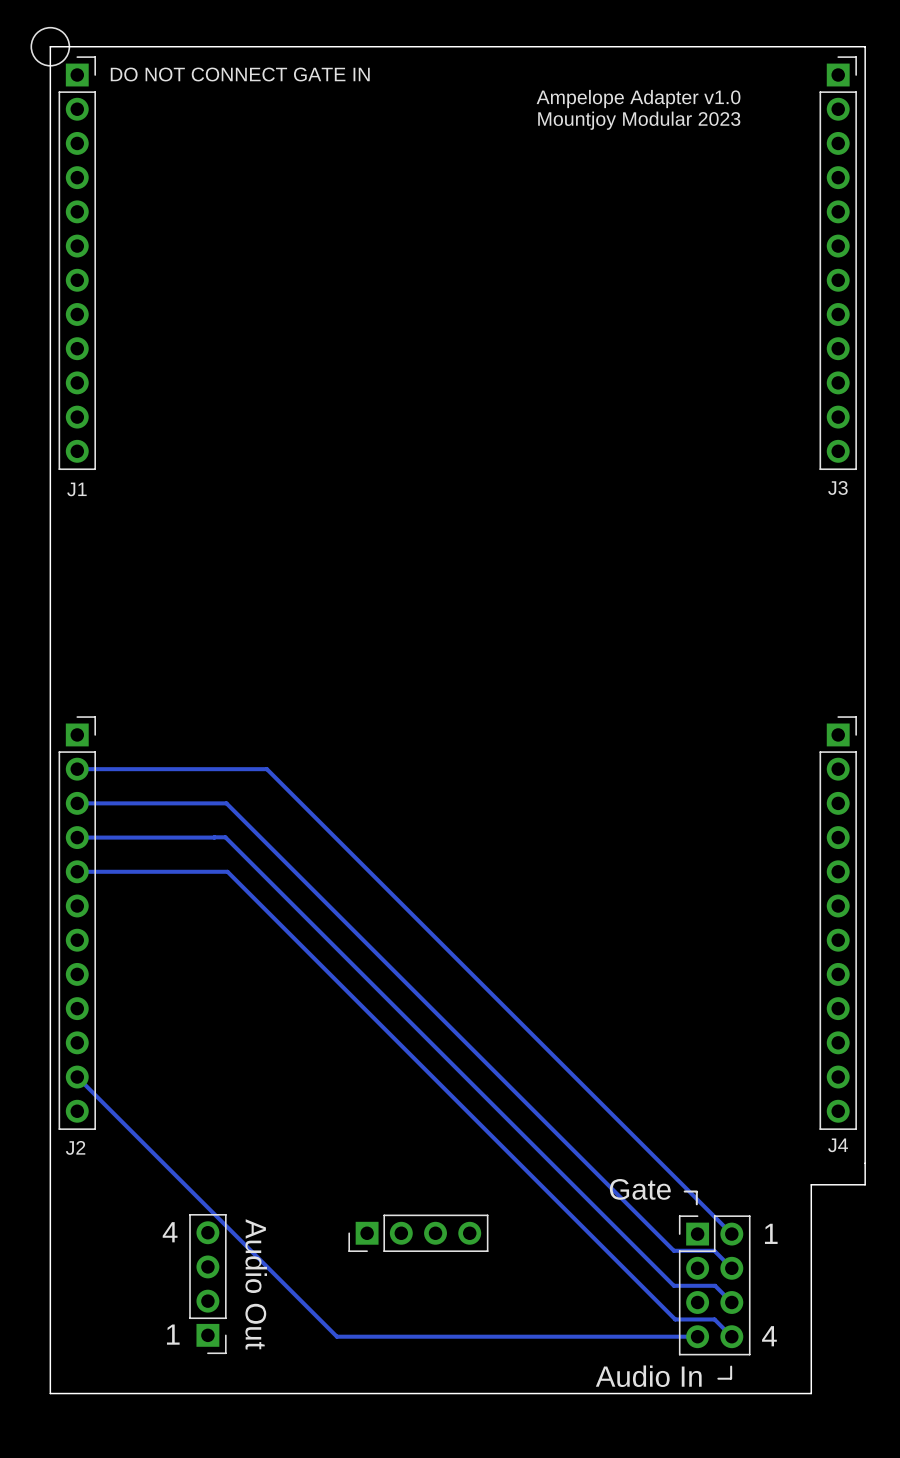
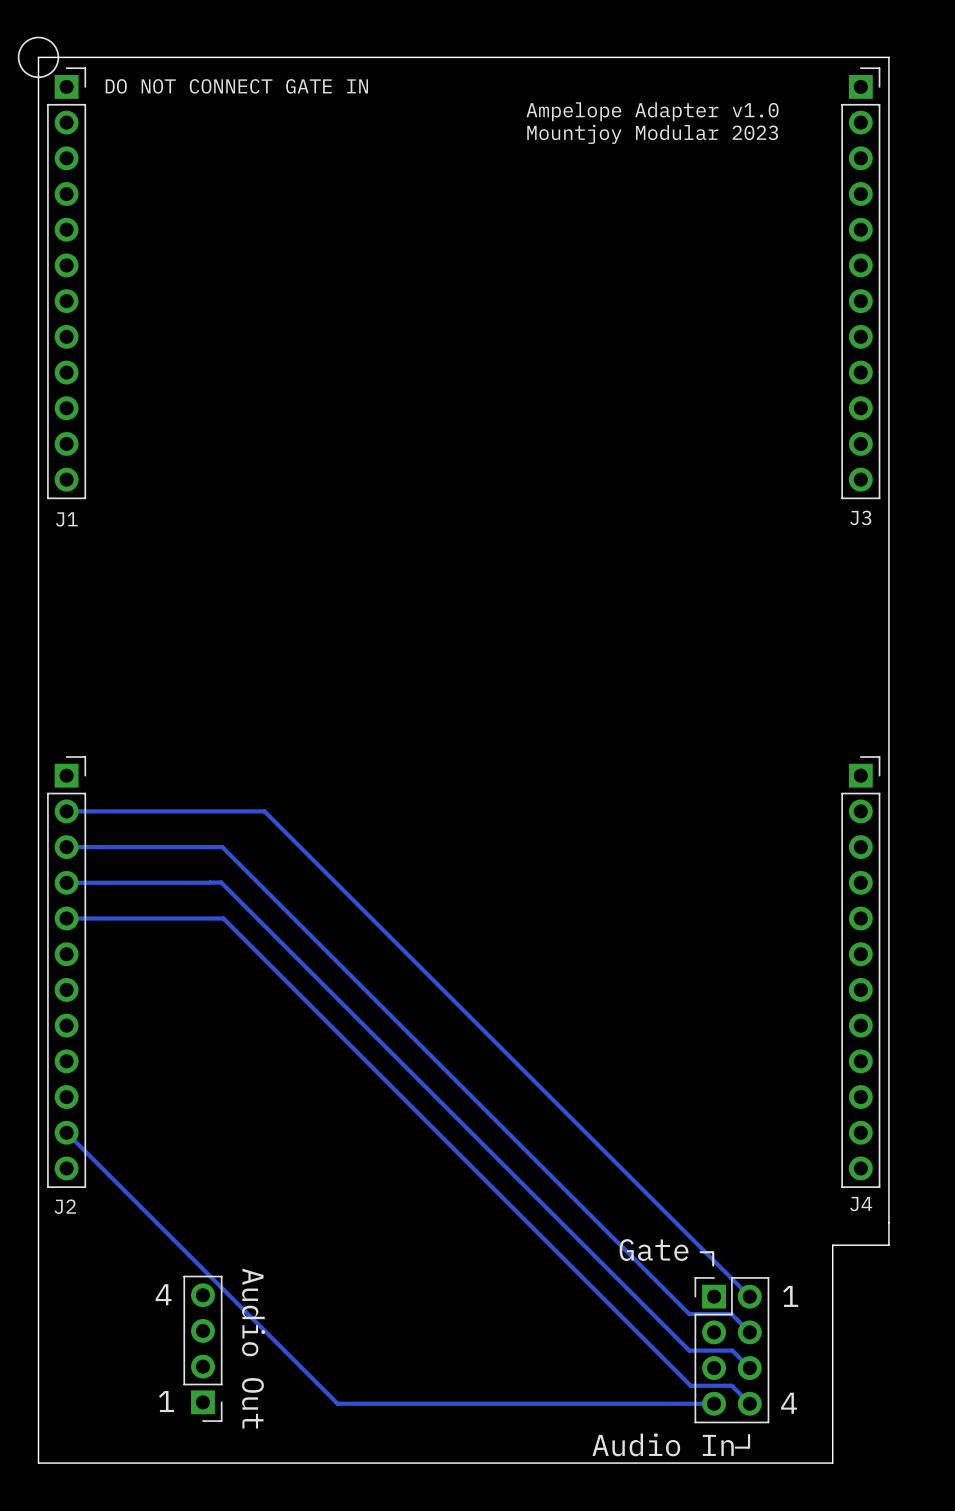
part: (418, 1233) -> none

